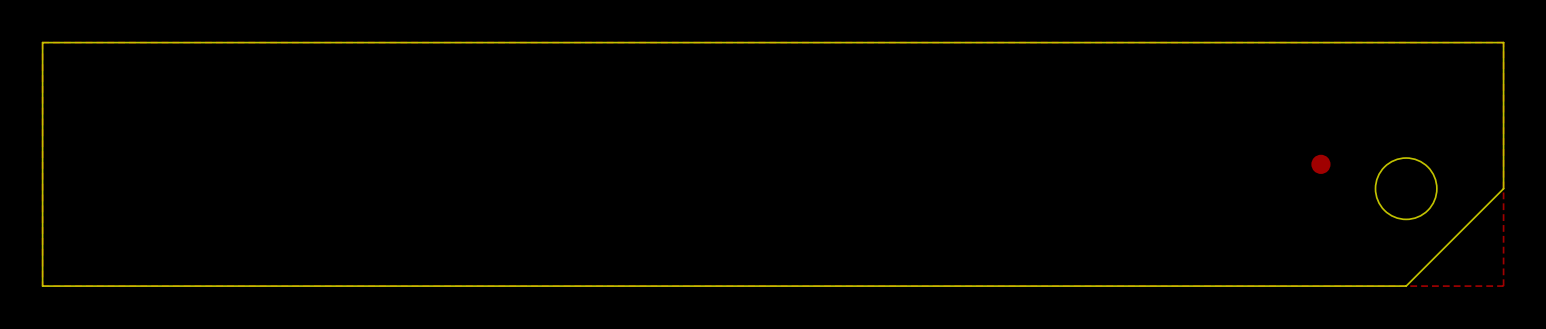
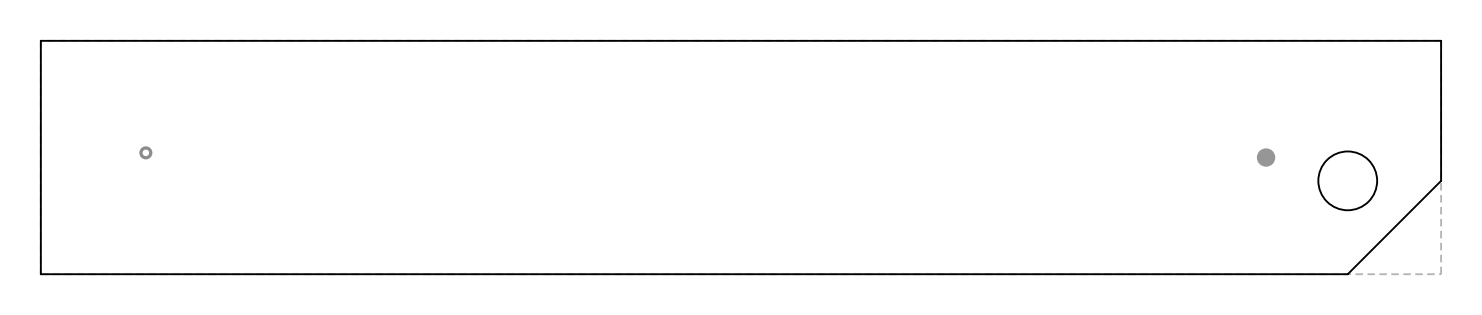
via: none -> (145, 152)

